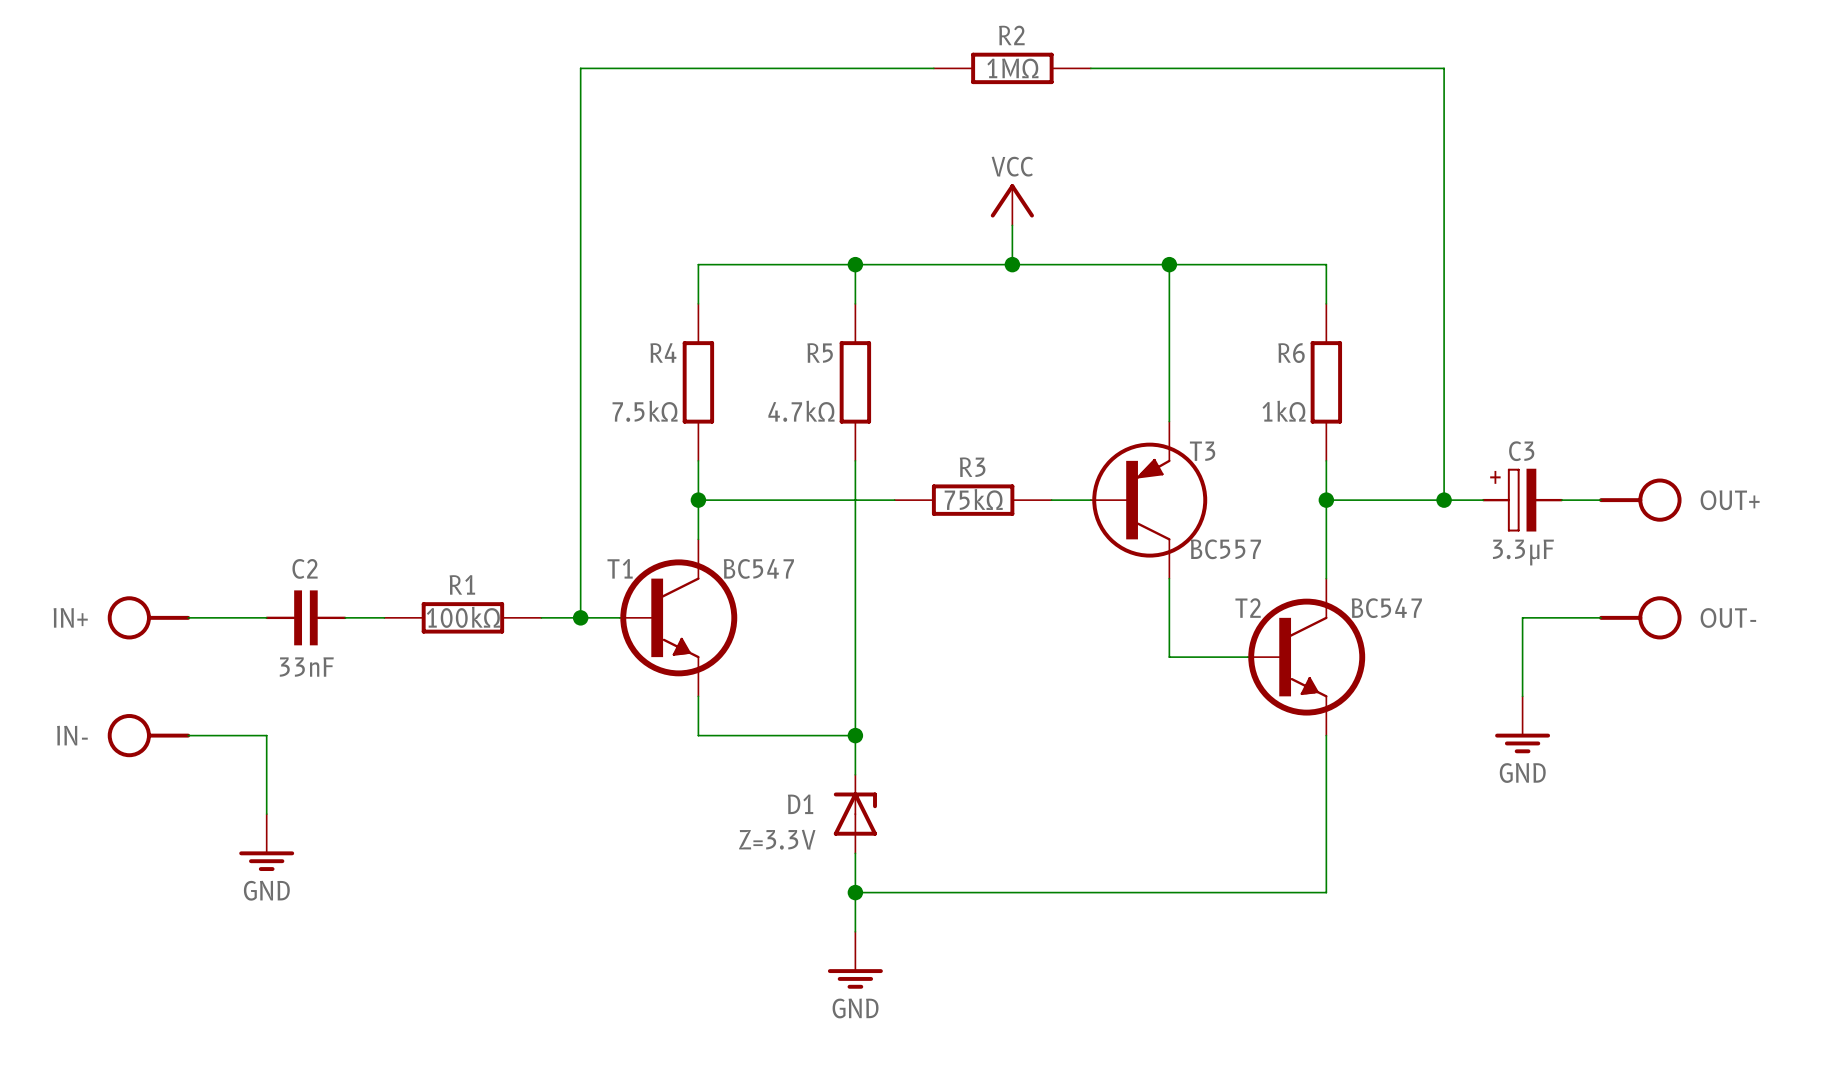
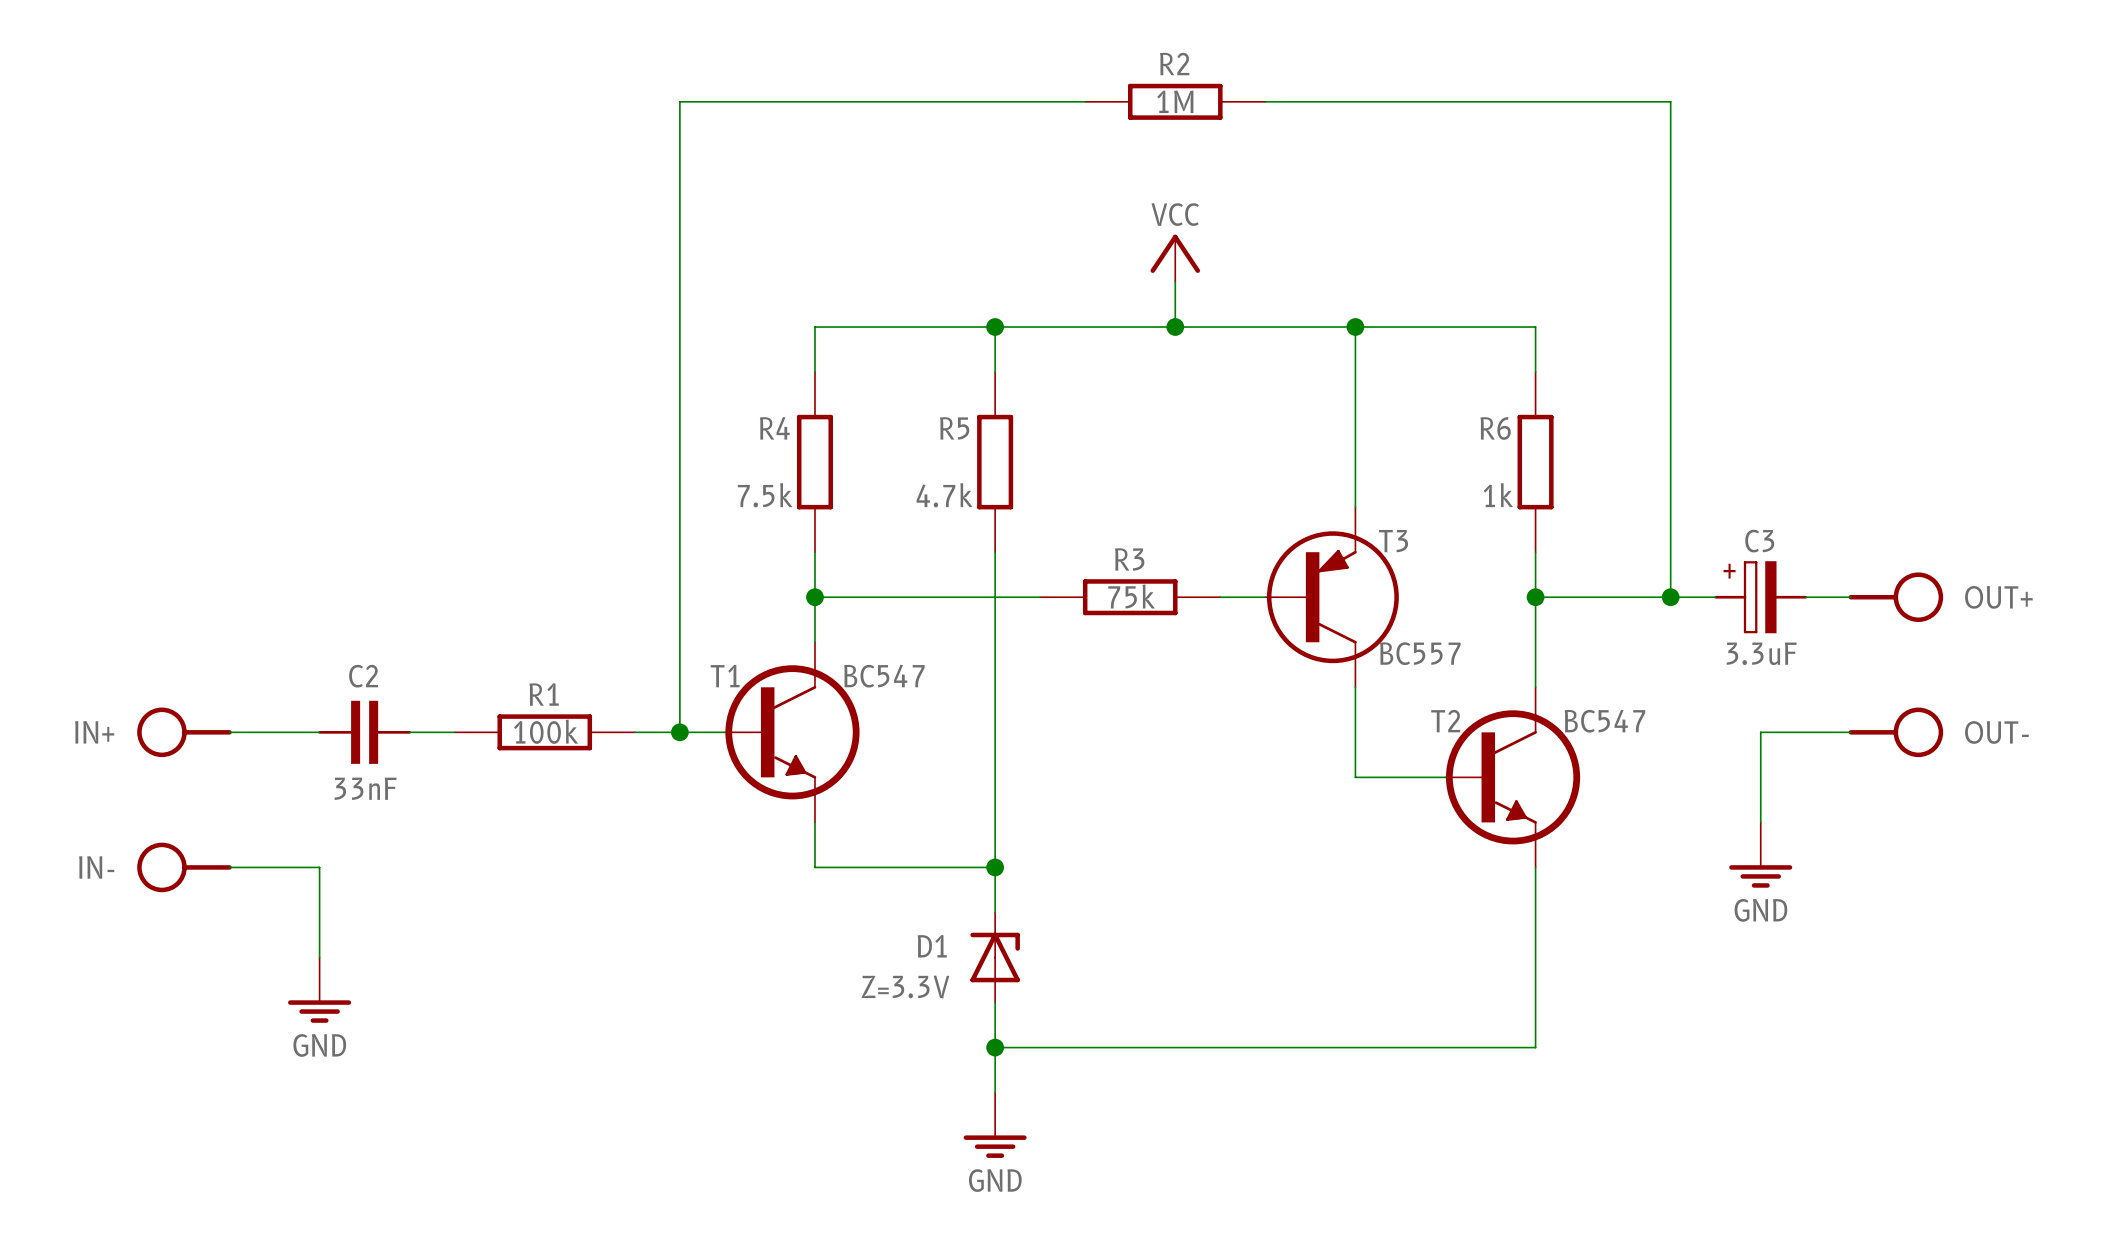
R2 value: 1MΩ (1012, 68) -> 1M (1175, 101)
R4 value: 7.5kΩ (645, 411) -> 7.5k (765, 495)
R5 value: 4.7kΩ (801, 411) -> 4.7k (944, 495)
R6 value: 1kΩ (1284, 411) -> 1k (1498, 495)
R3 value: 75kΩ (973, 499) -> 75k (1131, 596)
C3 value: 3.3μF (1523, 552) -> 3.3uF (1761, 653)
R1 value: 100kΩ (463, 617) -> 100k (546, 731)

